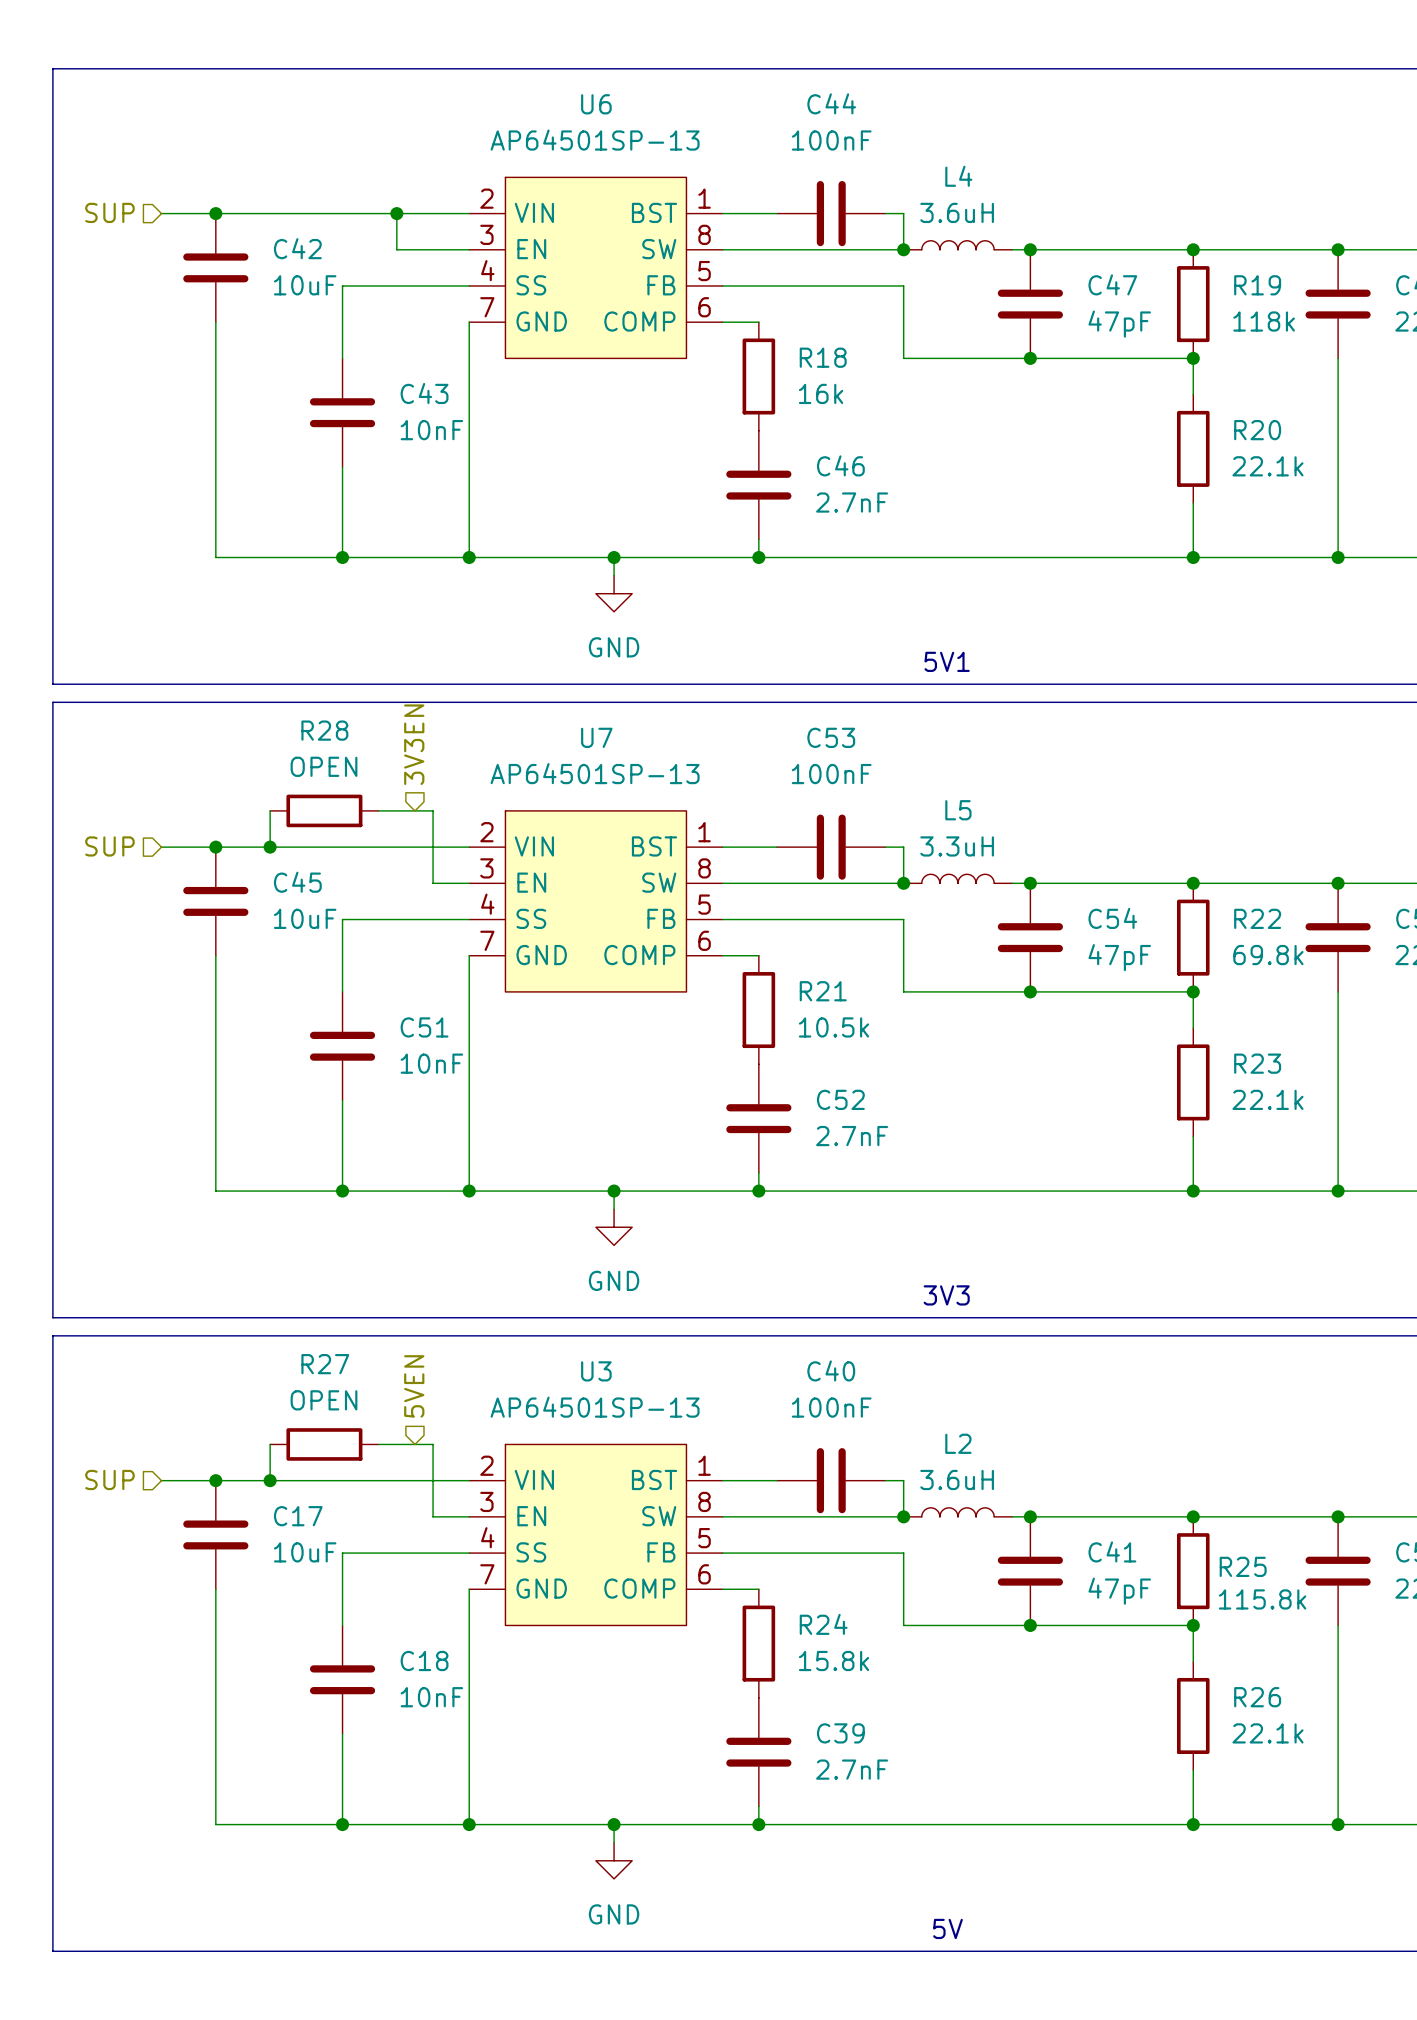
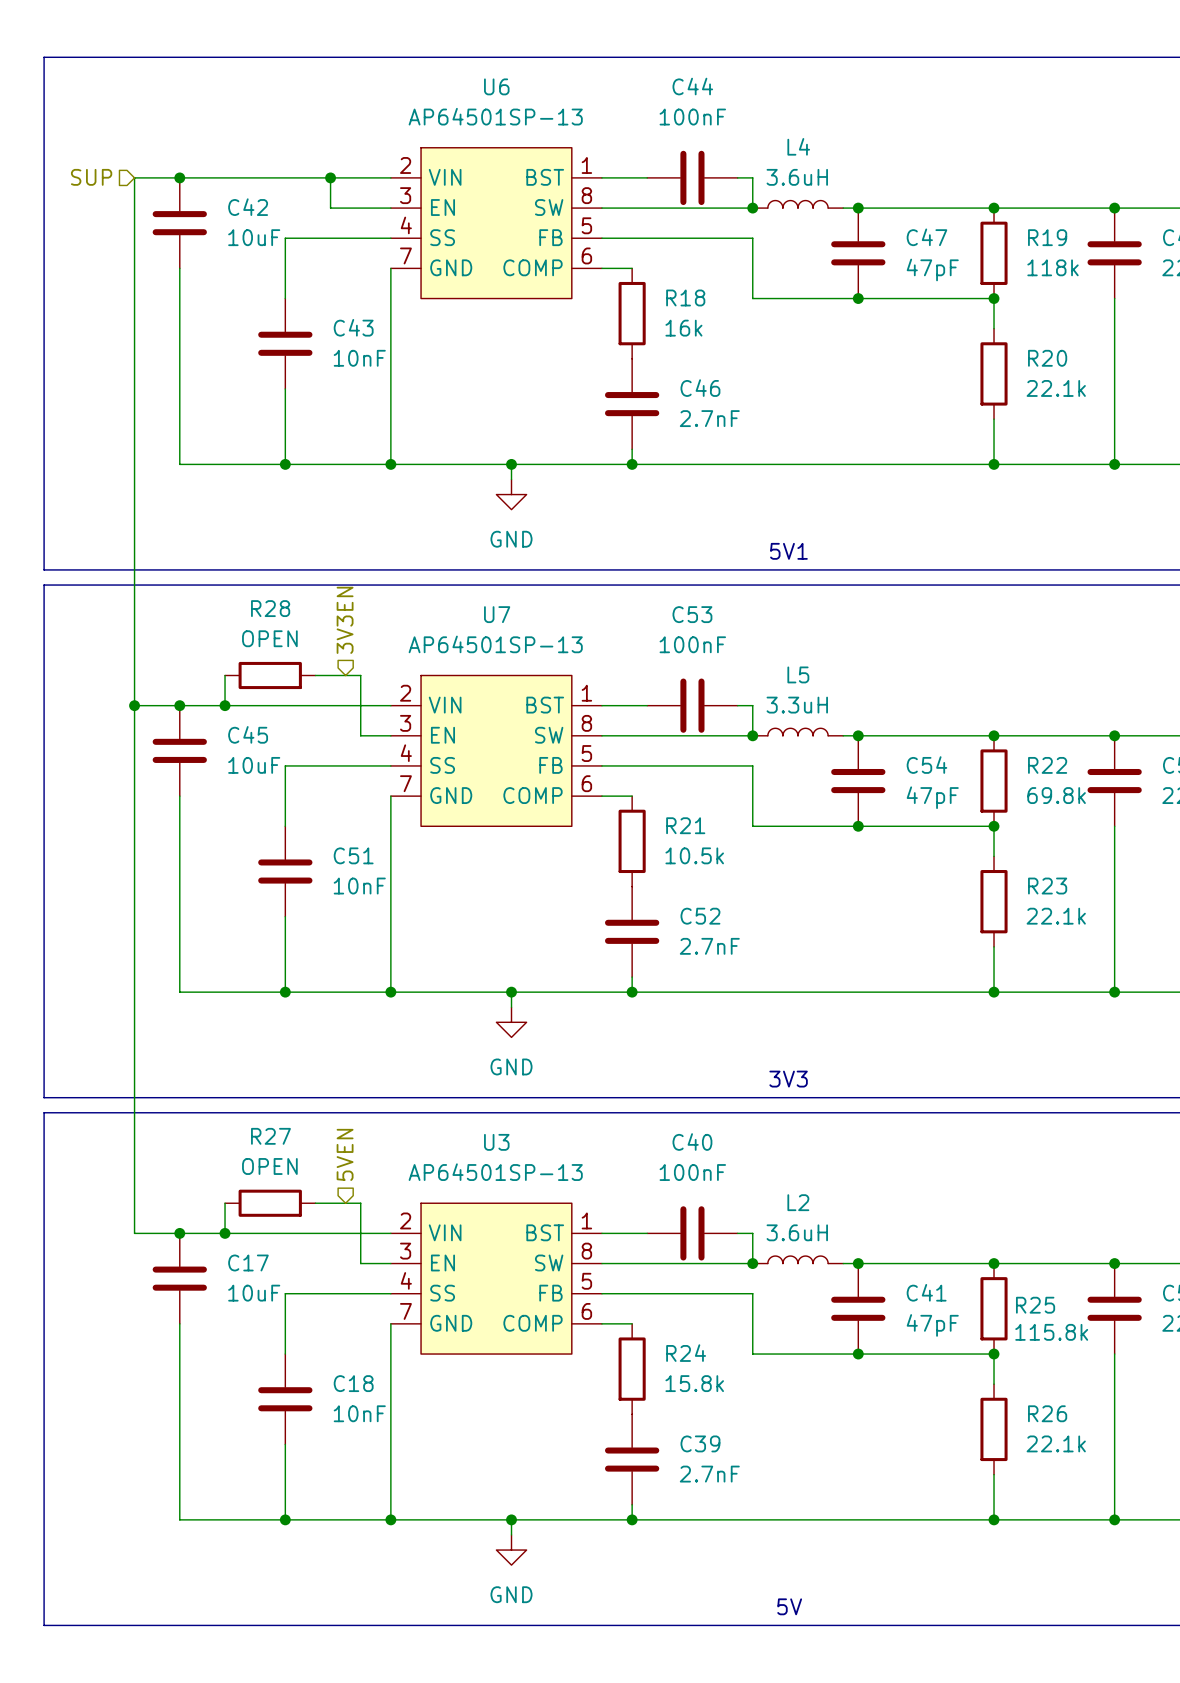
wire: none -> (134, 177) (134, 1233)
hierarchical label: SUP (109, 846) -> none
junction: none -> (134, 705)
hierarchical label: SUP (109, 1479) -> none

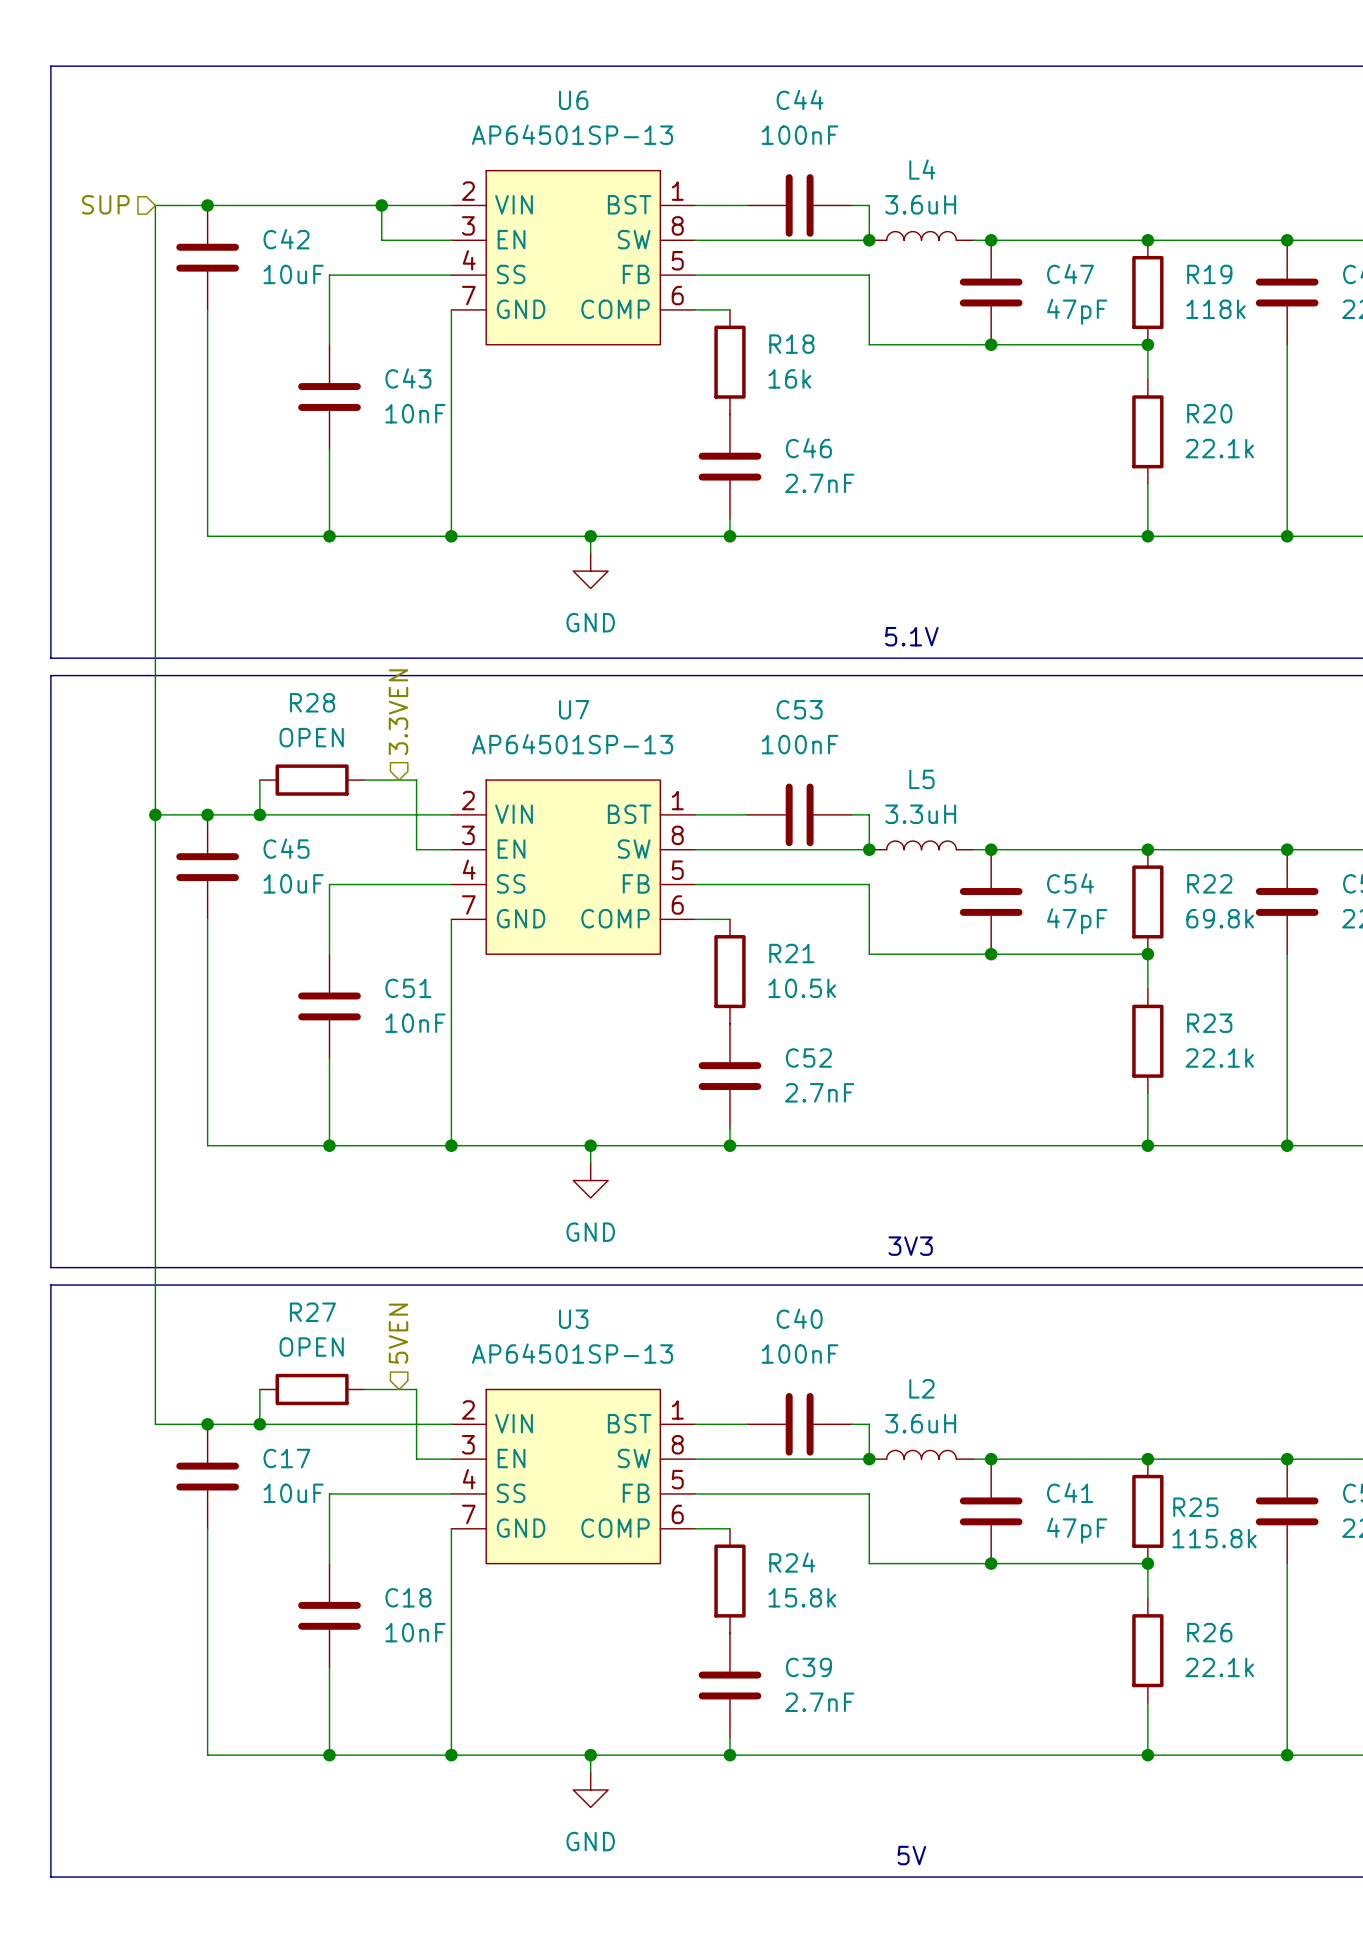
text: 5V1 (788, 551) -> 5.1V (911, 636)
hierarchical label: 3V3EN (345, 620) -> 3.3VEN (398, 712)

